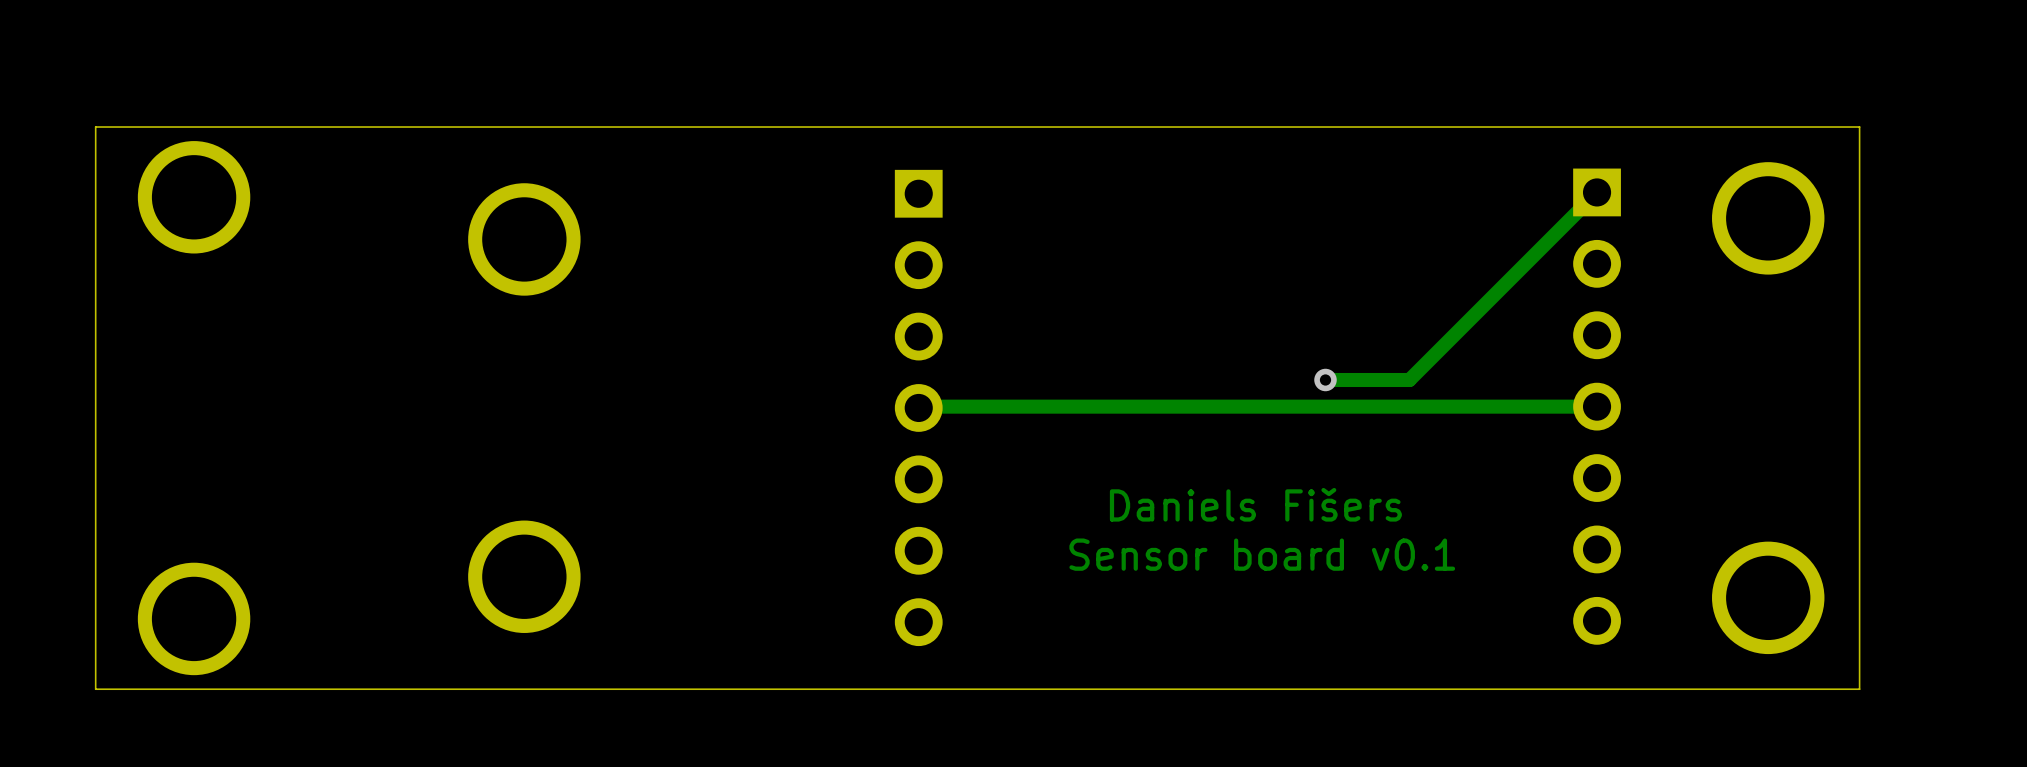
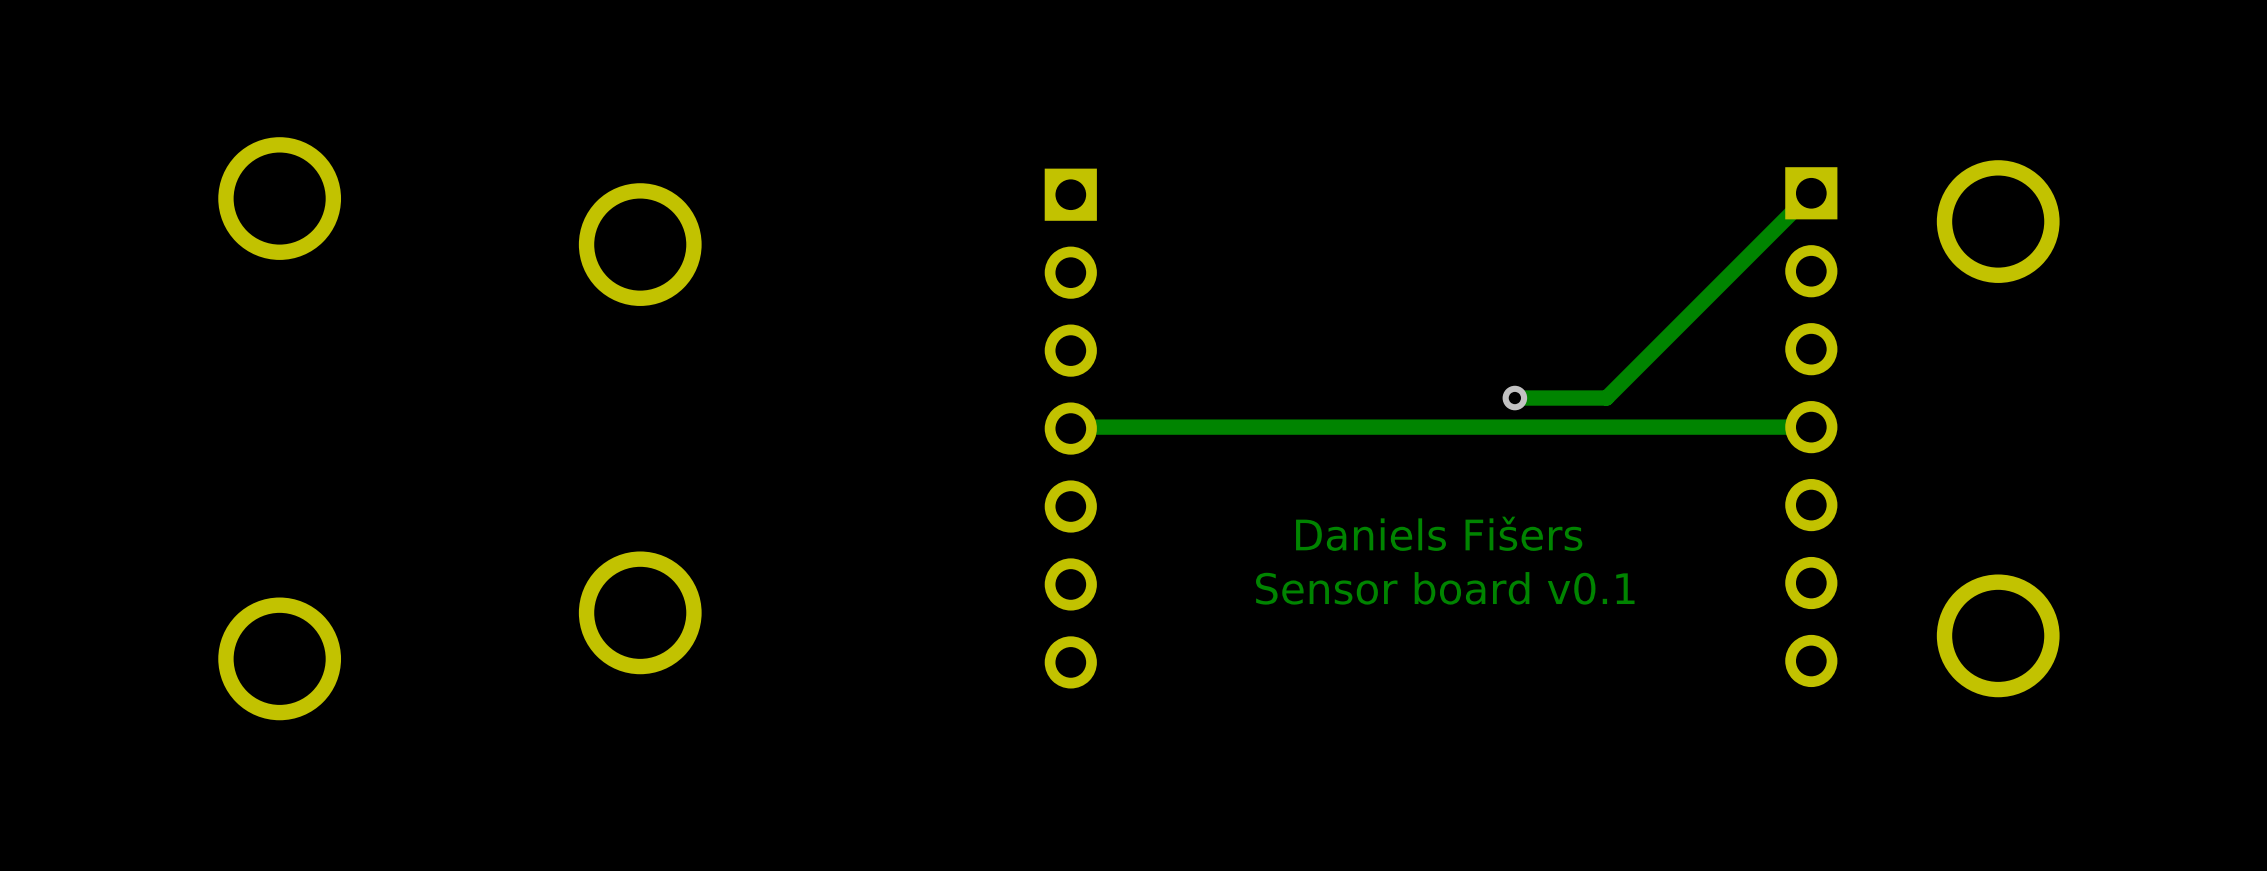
board edge: (1859, 127) (1859, 689) (95, 689) (95, 127) (1859, 127) -> none

